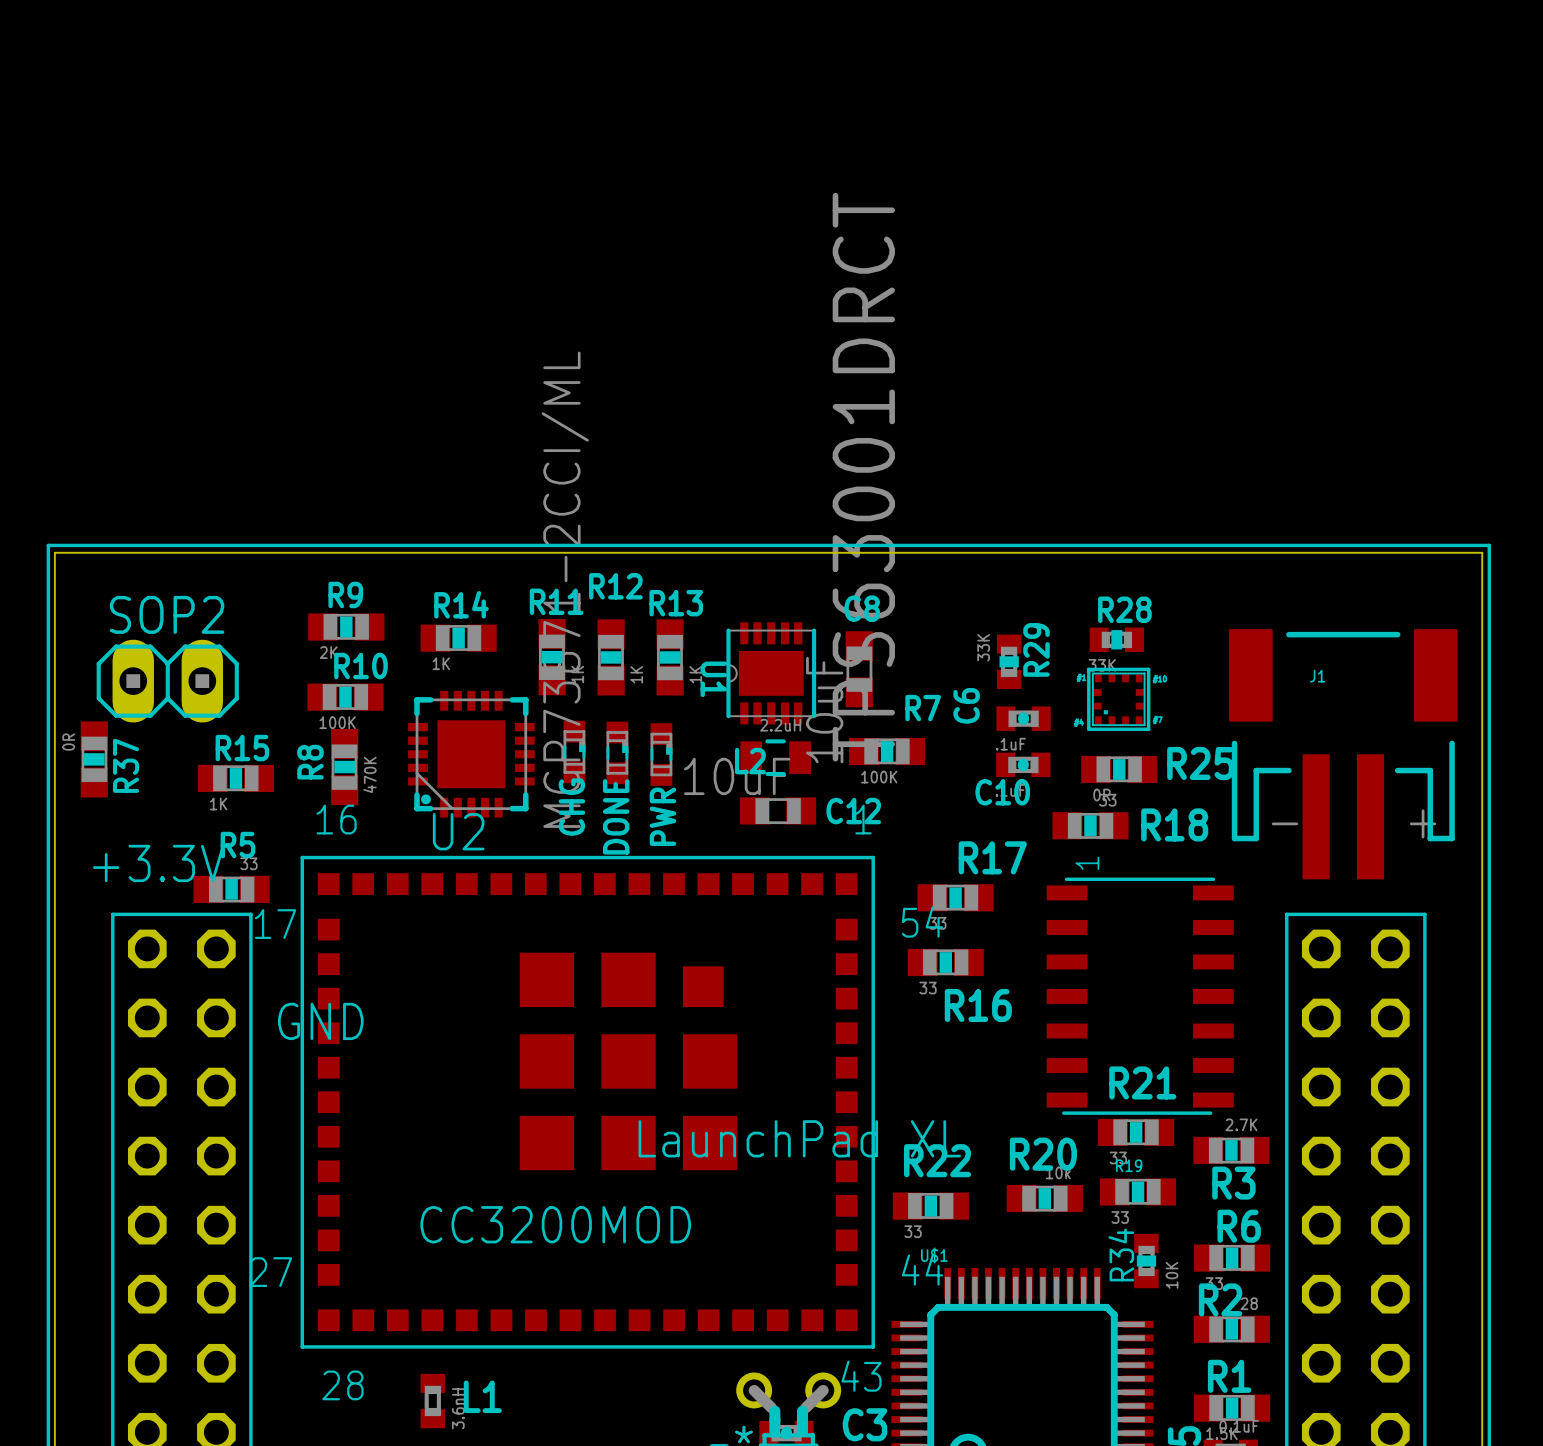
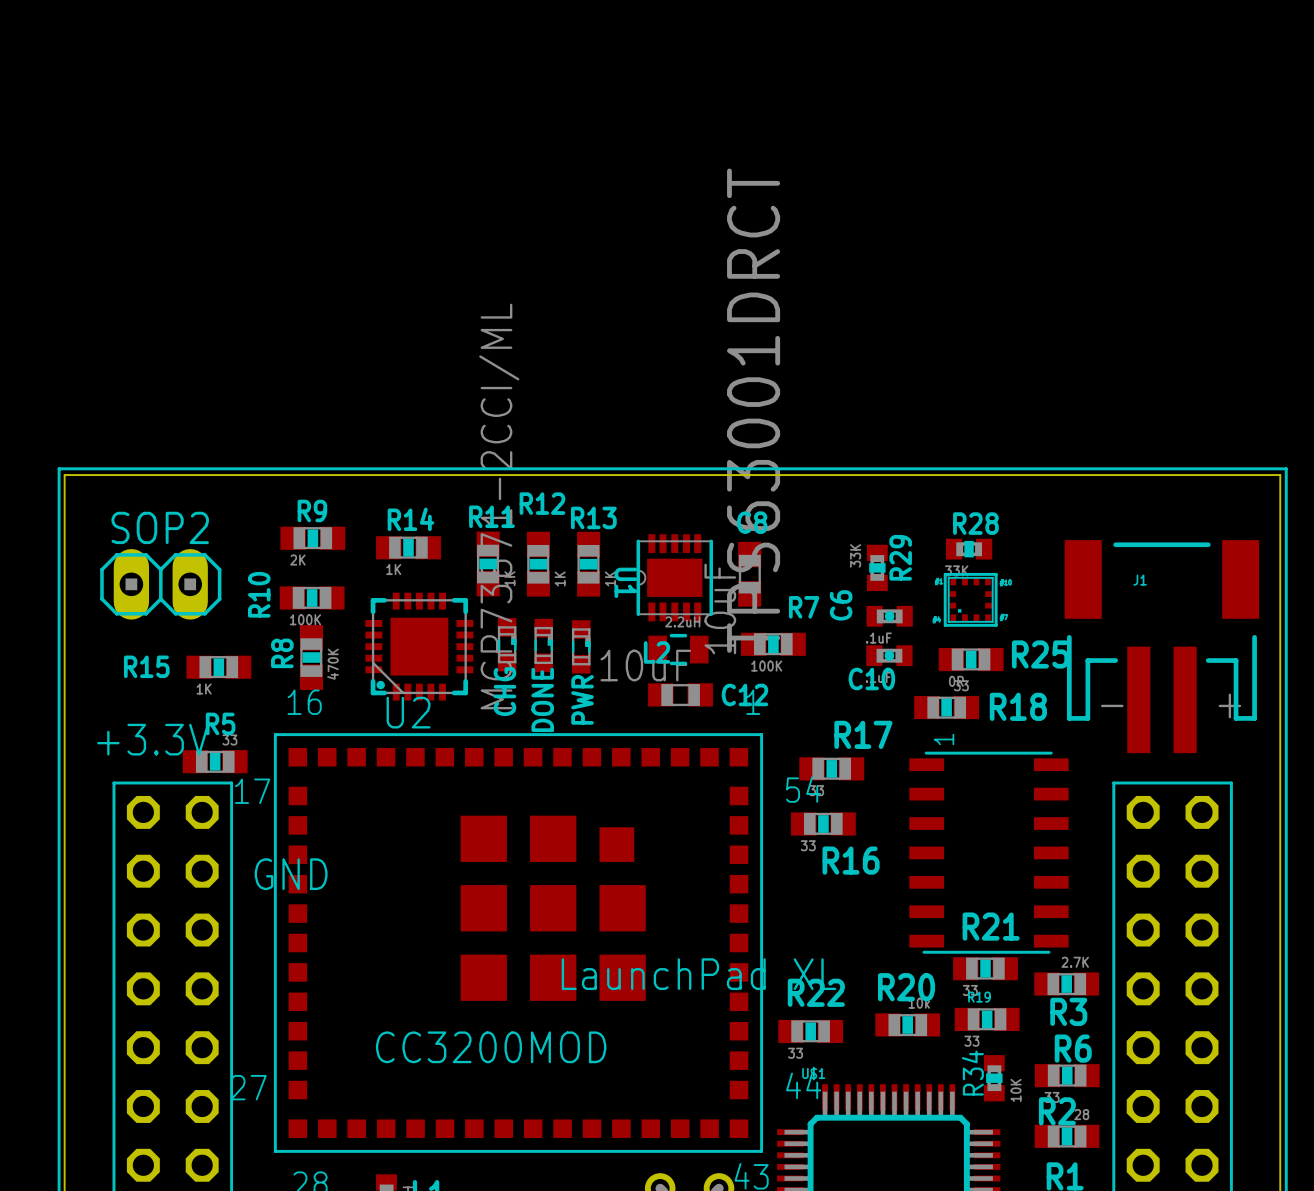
R10 name rotation: 0° (360, 666) -> 90° counterclockwise (259, 594)
R10 name position: R10 (360, 666) -> R10 (259, 594)
R15 name position: R15 (242, 748) -> R15 (146, 666)
R37: 0R (94, 759) -> none

